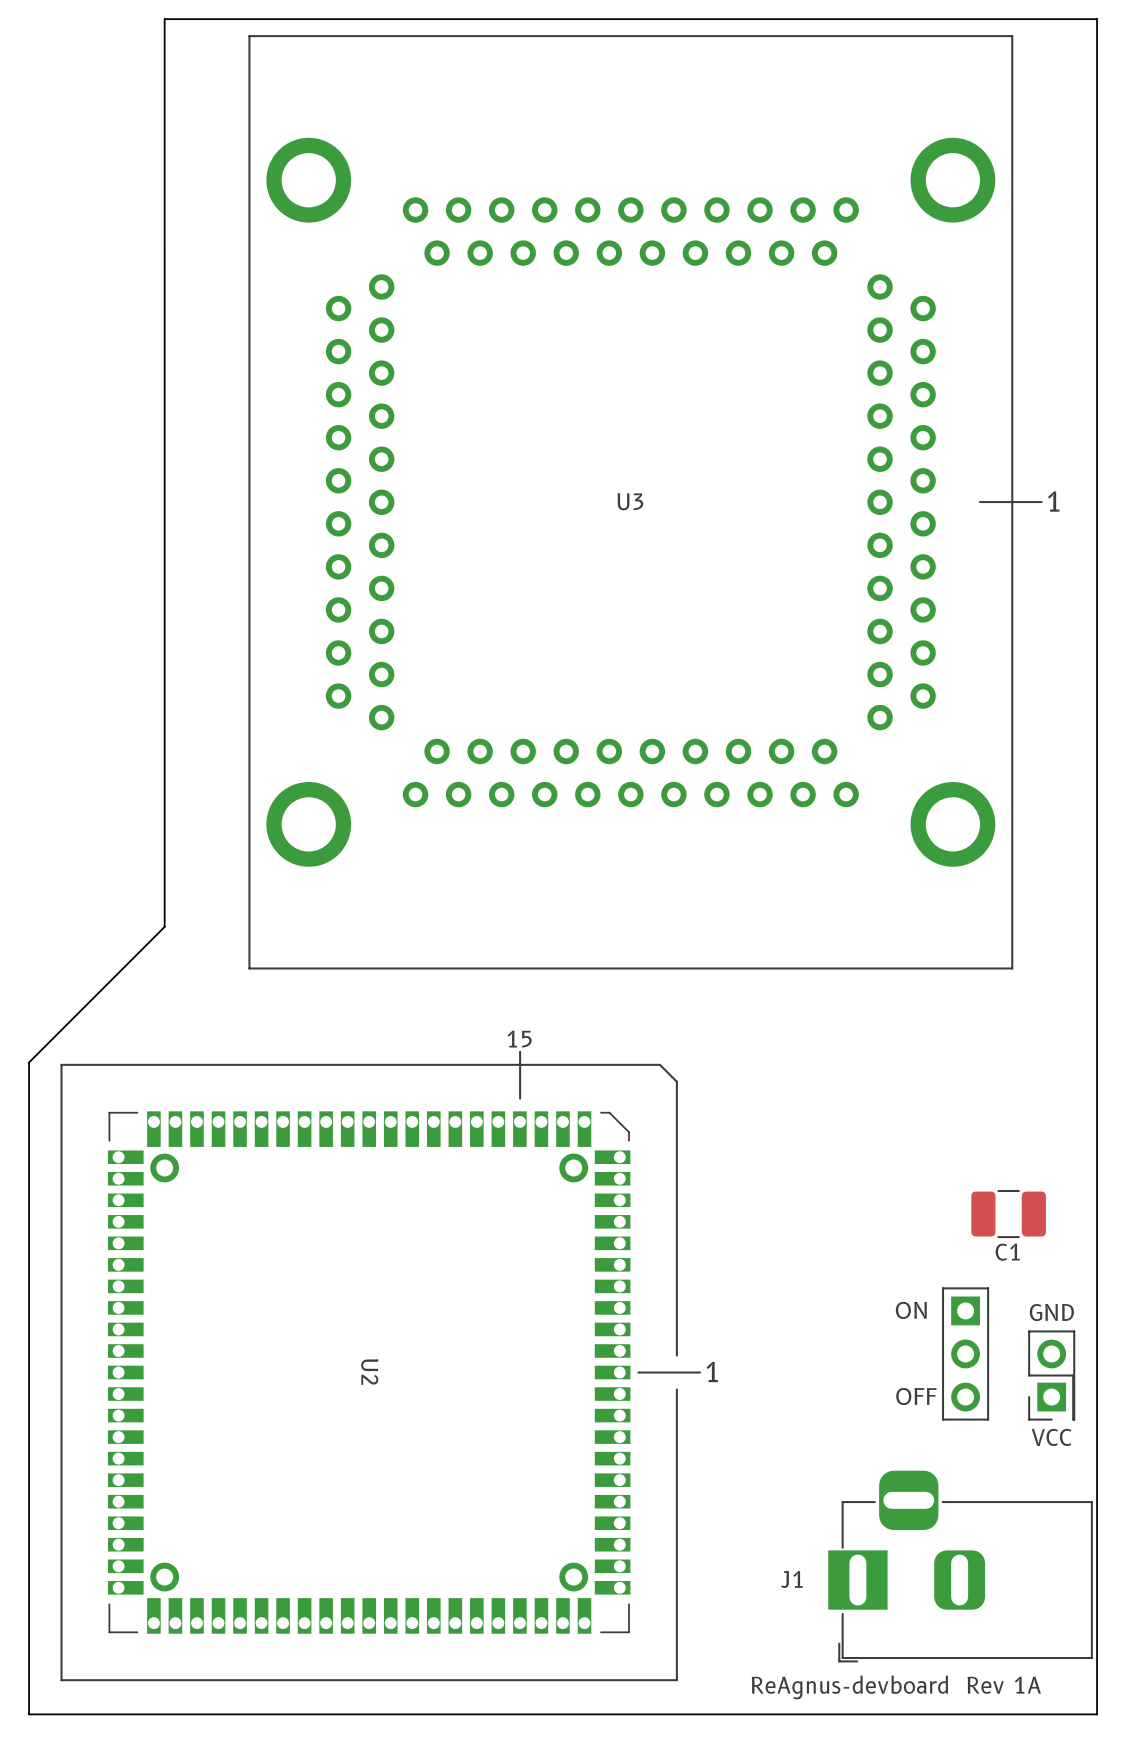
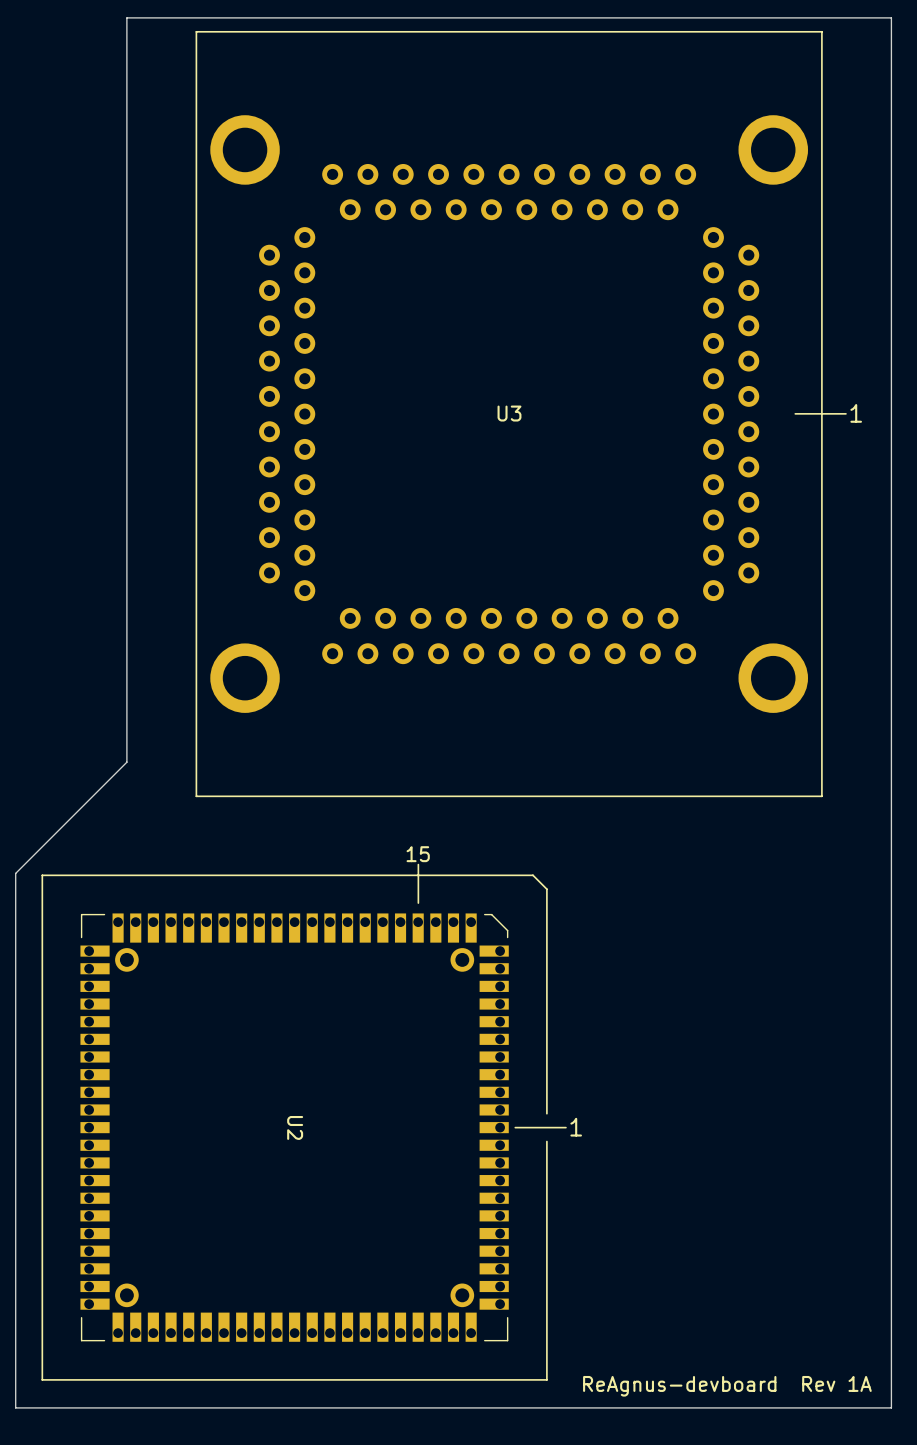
C1: (1008, 1214) -> none
text: ON (911, 1310) -> none
text: GND (1051, 1312) -> none
part: (965, 1353) -> none
part: (1051, 1375) -> none
text: OFF (916, 1396) -> none
text: VCC (1051, 1437) -> none
J1: (960, 1566) -> none

